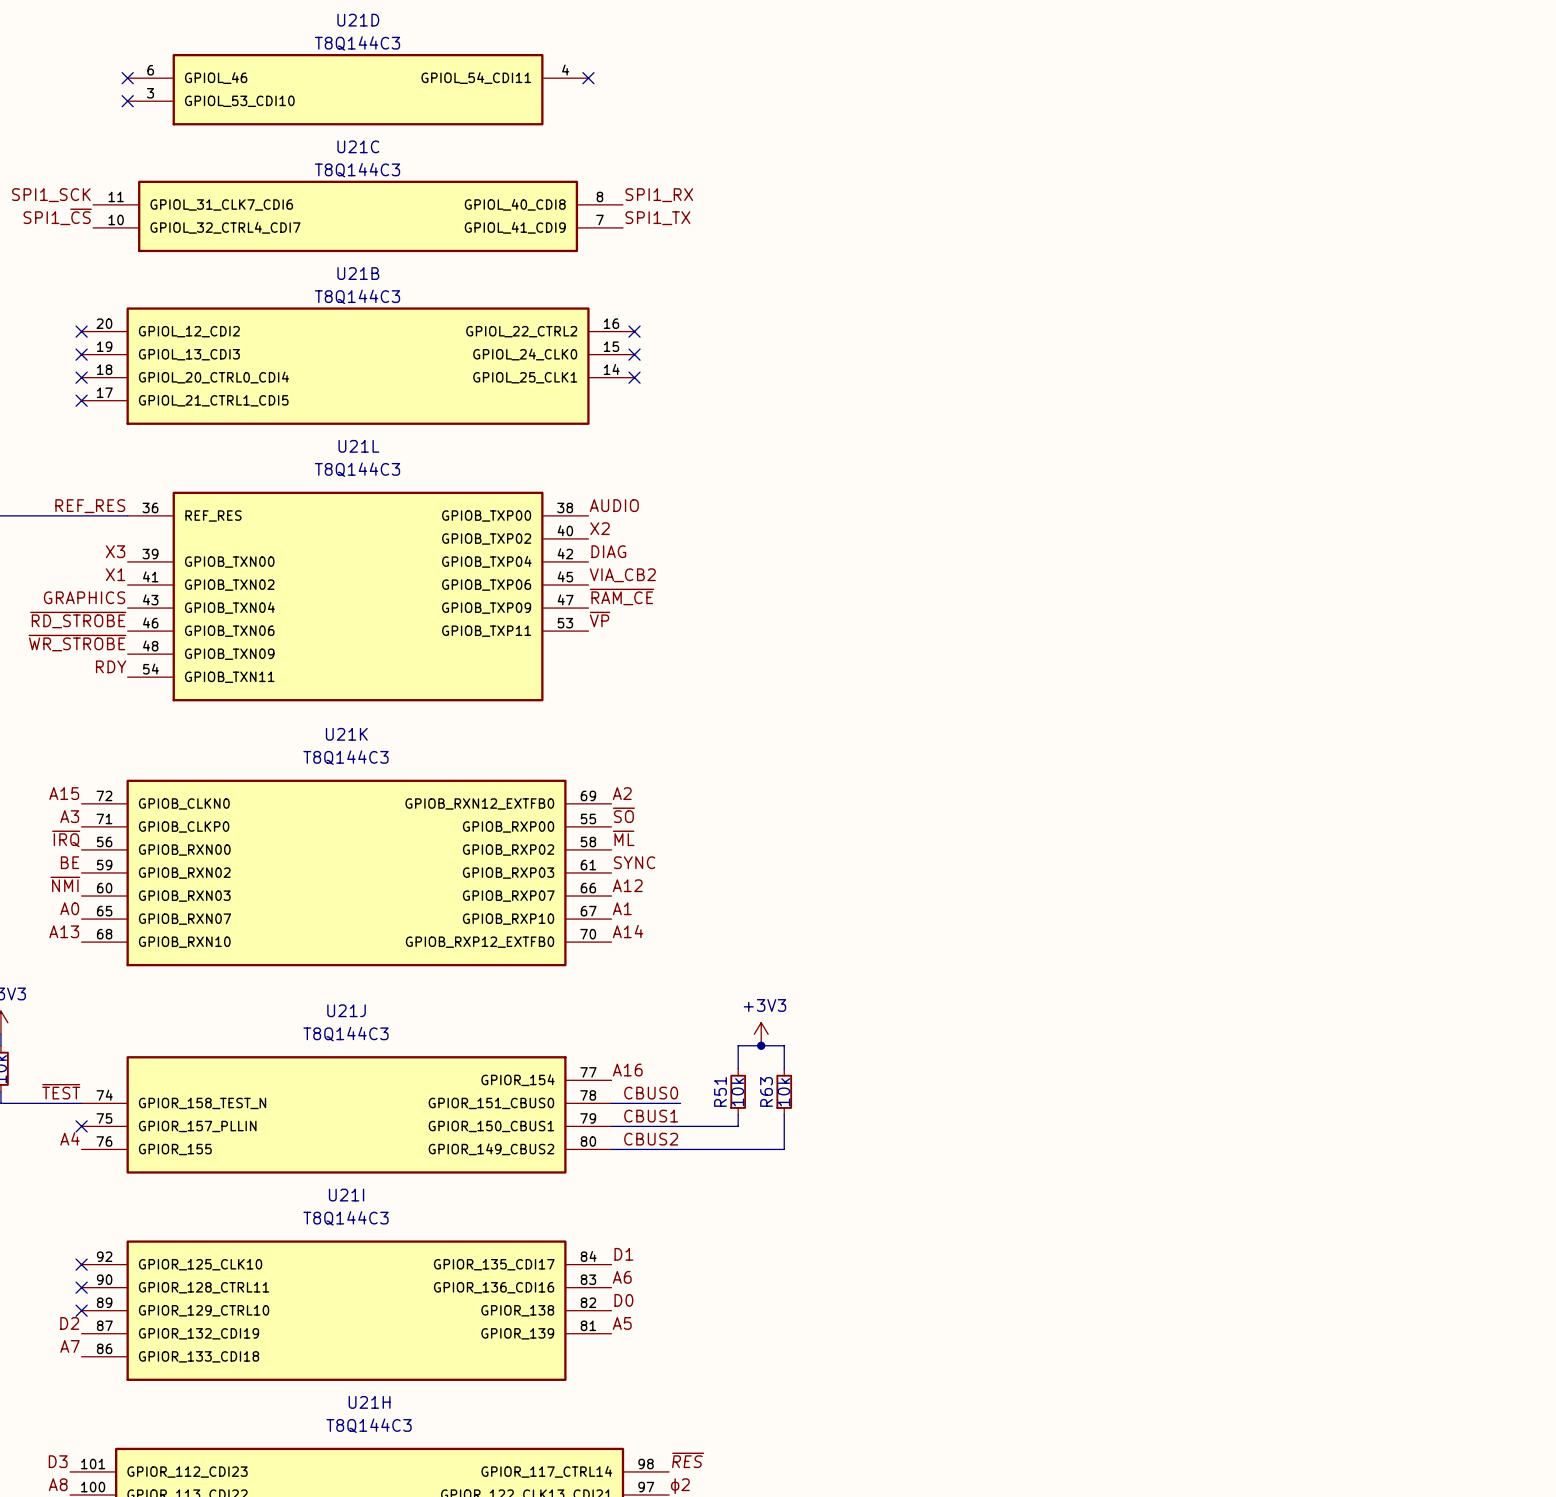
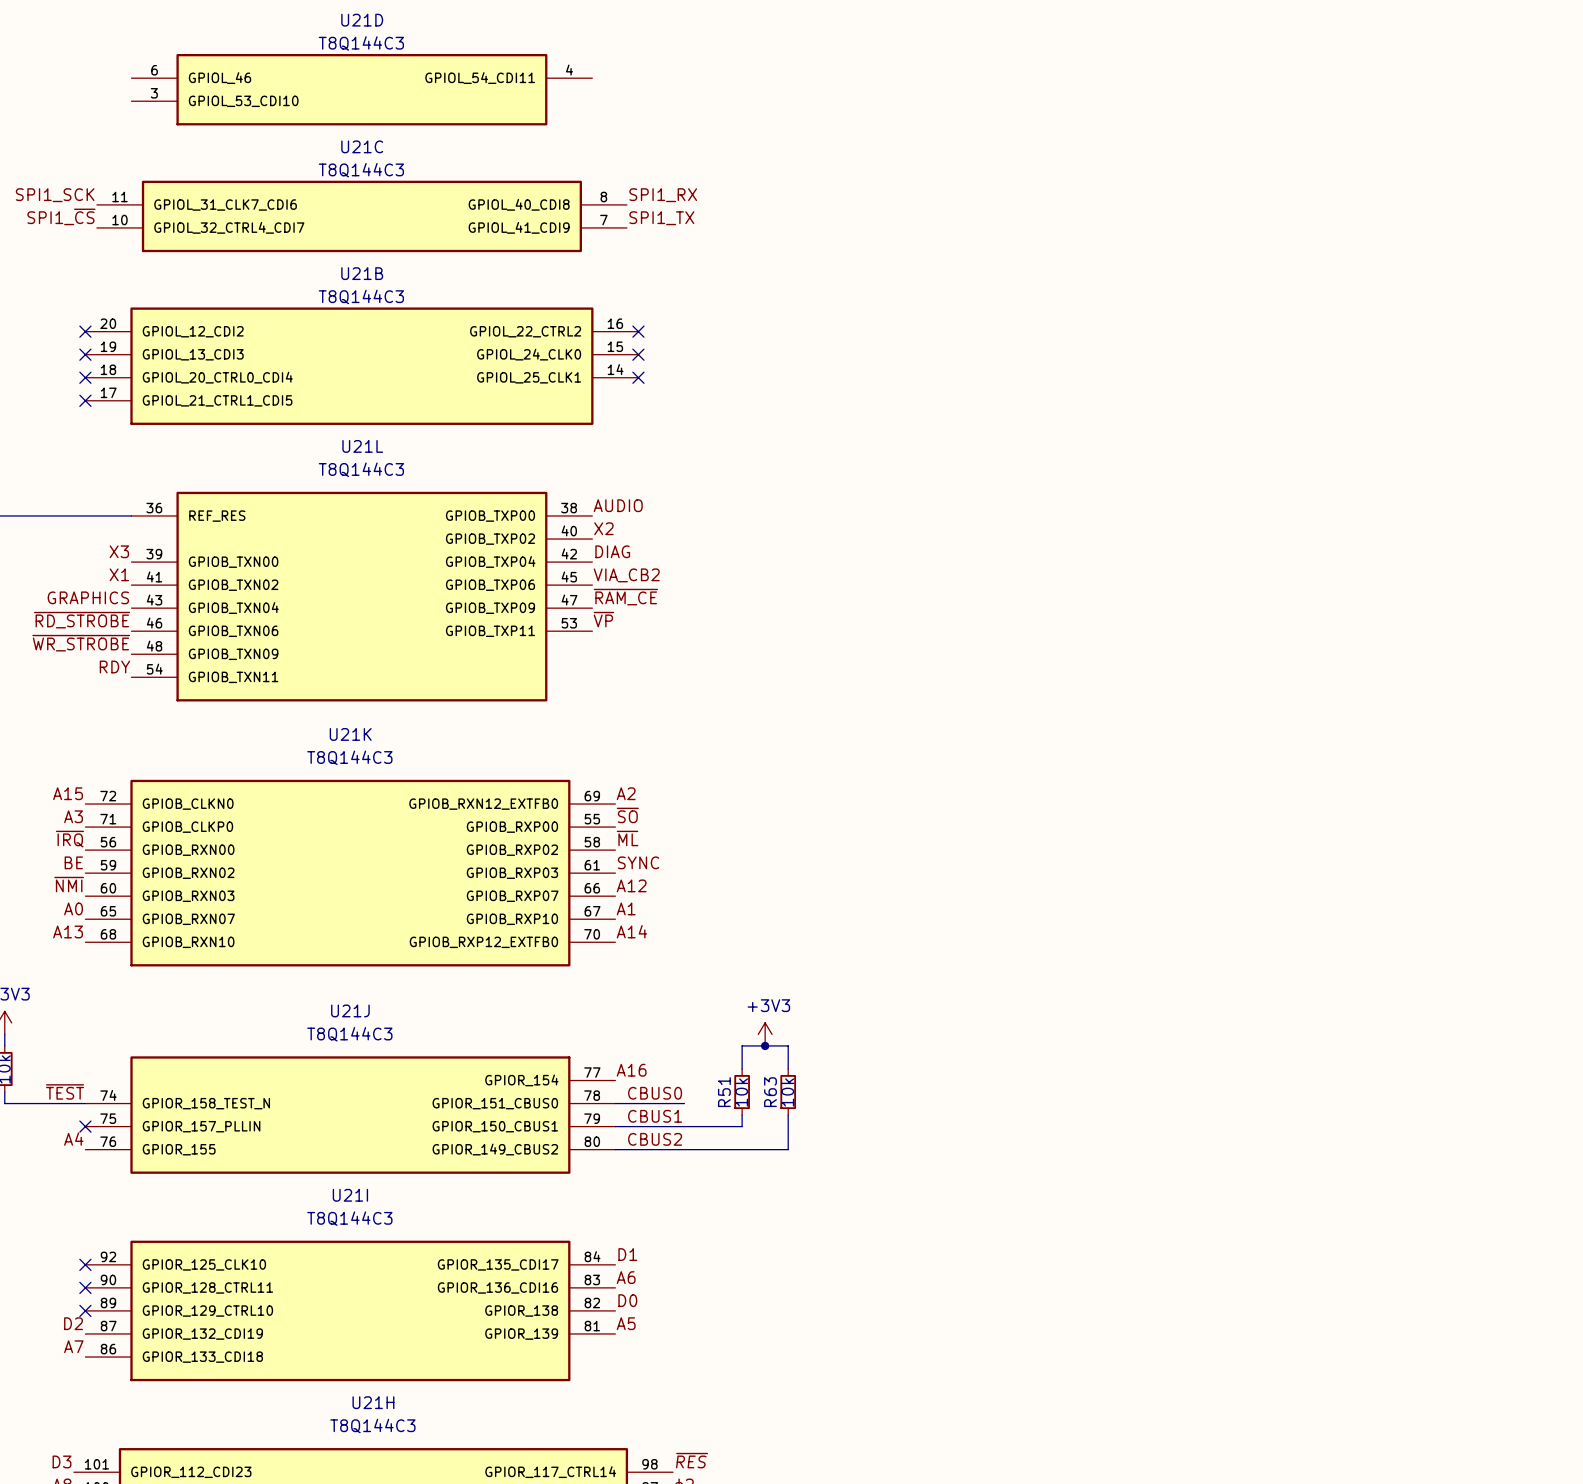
no-connect mark: (127, 78) -> none
no-connect mark: (588, 78) -> none
no-connect mark: (127, 101) -> none
label: REF_RES (90, 506) -> none

